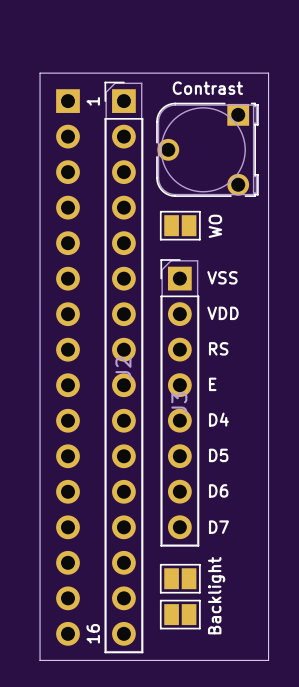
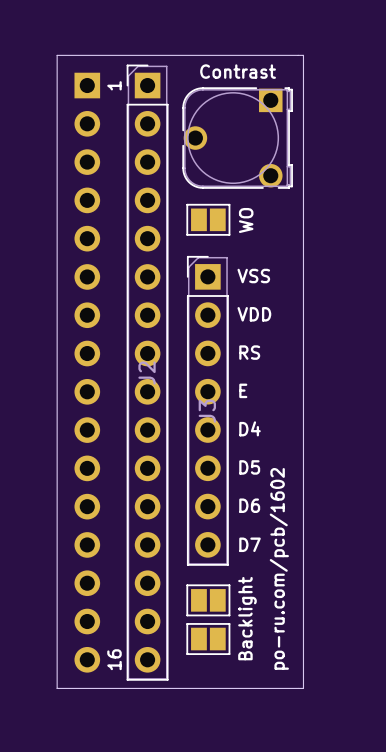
text: none -> po-ru.com/pcb/1602 (279, 568)

